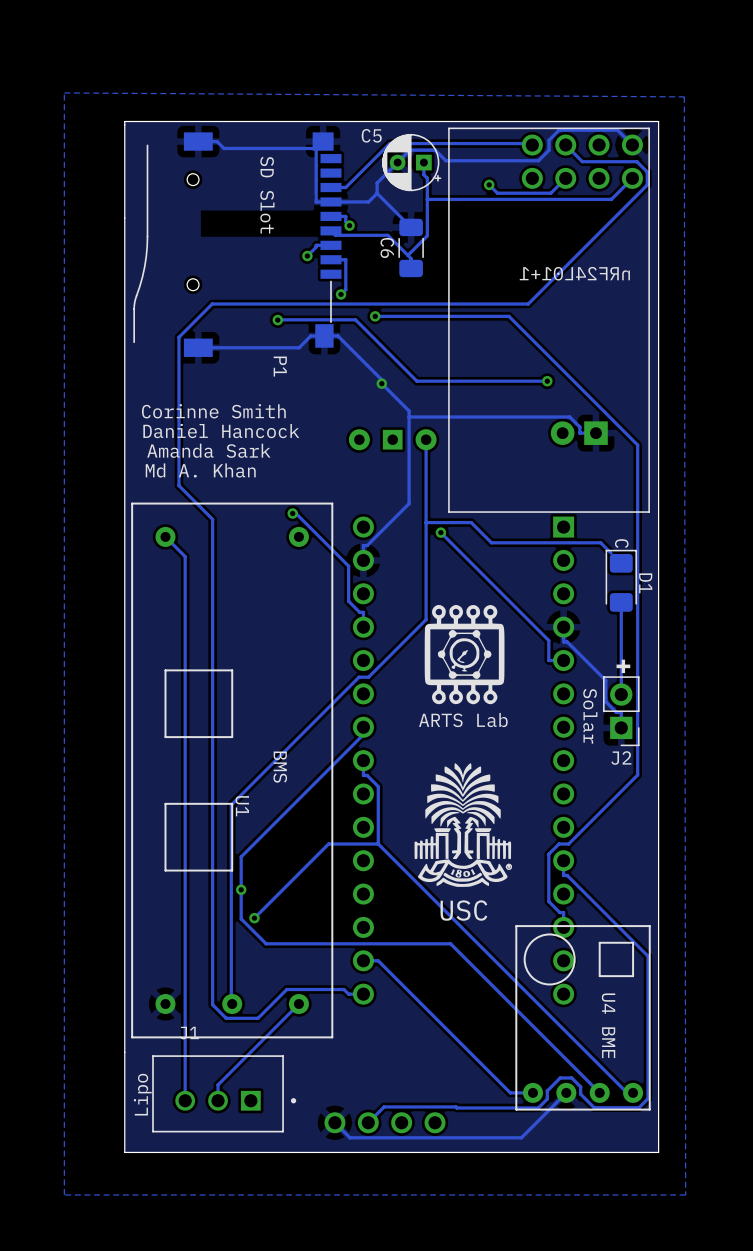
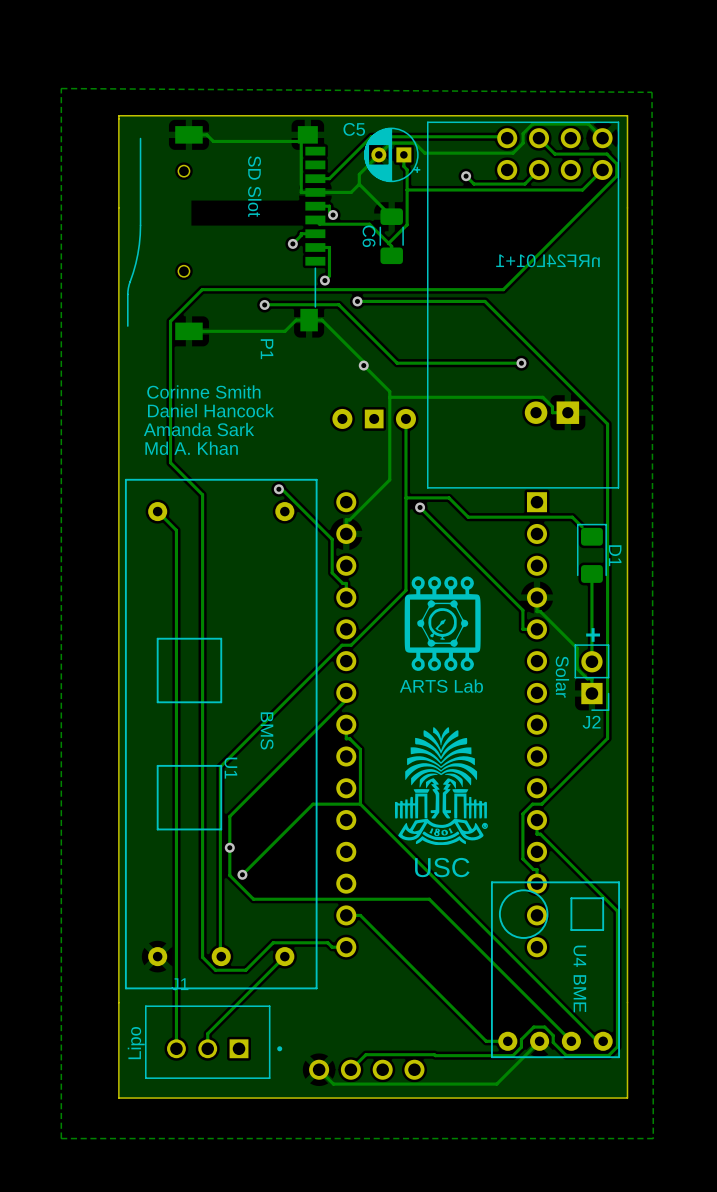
text: C (621, 543) -> none

